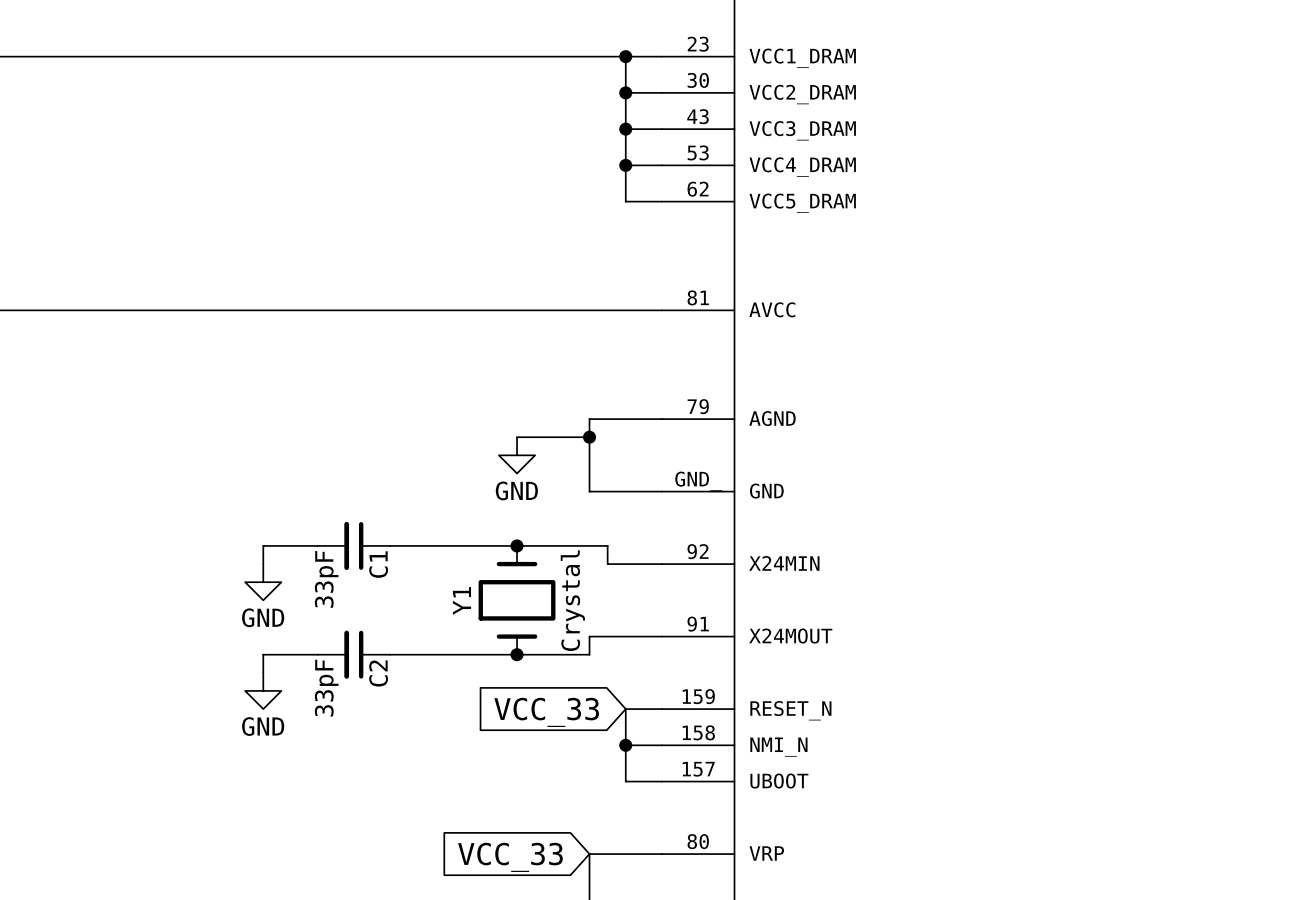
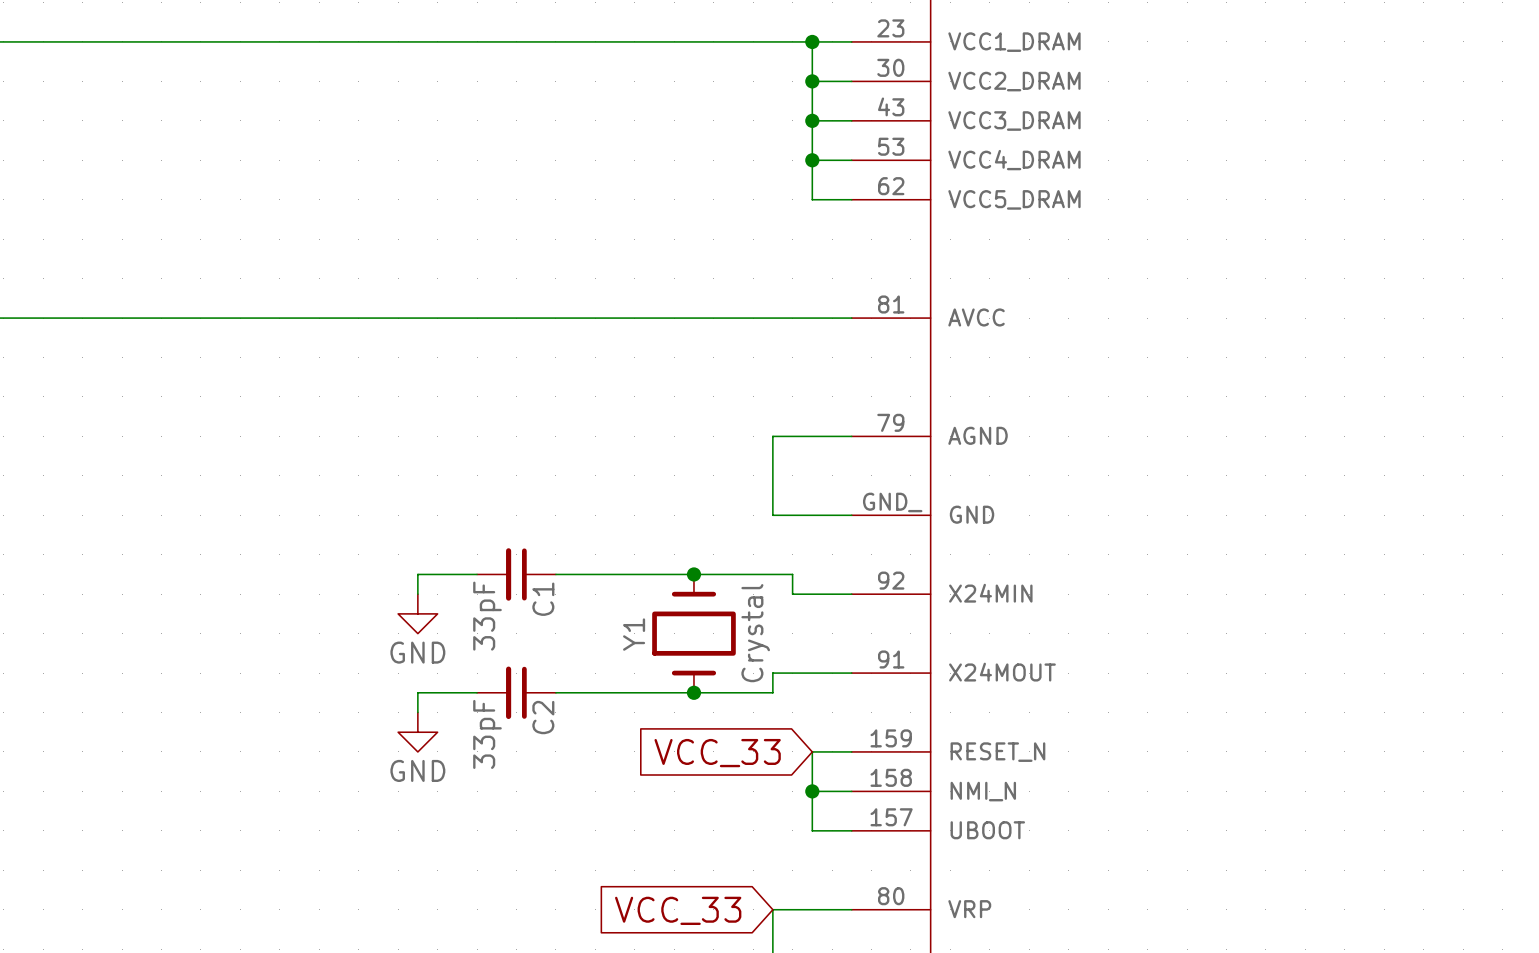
wire: (517, 437) (589, 437) -> none
junction: (589, 437) -> none
power symbol: GND (517, 455) -> none

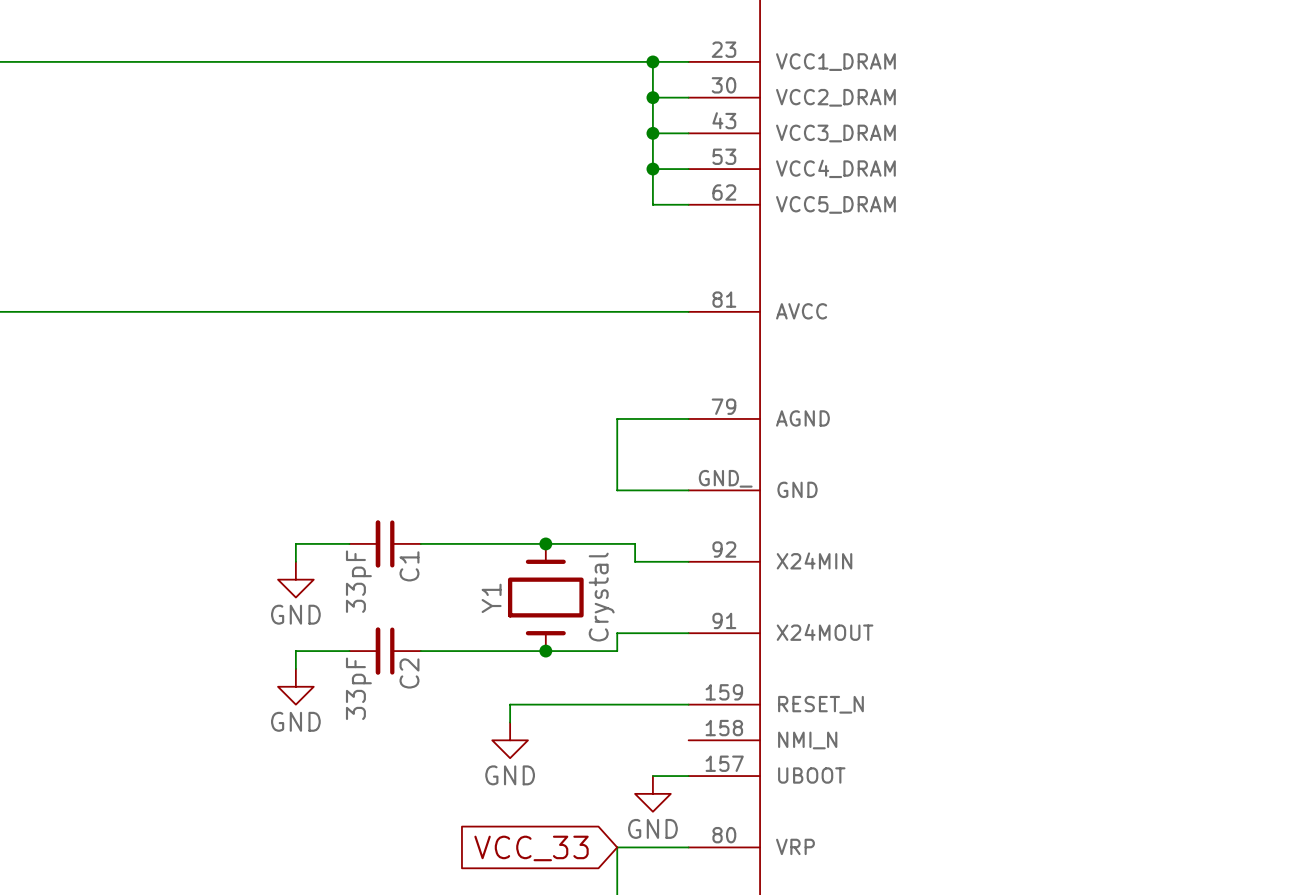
wire: (812, 751) (812, 830) -> (652, 704) (510, 704) (510, 722)
global label: VCC_33 (717, 753) -> none
power symbol: none -> GND (510, 740)
wire: (812, 791) (851, 791) -> none
junction: (812, 791) -> none
power symbol: none -> GND (652, 793)

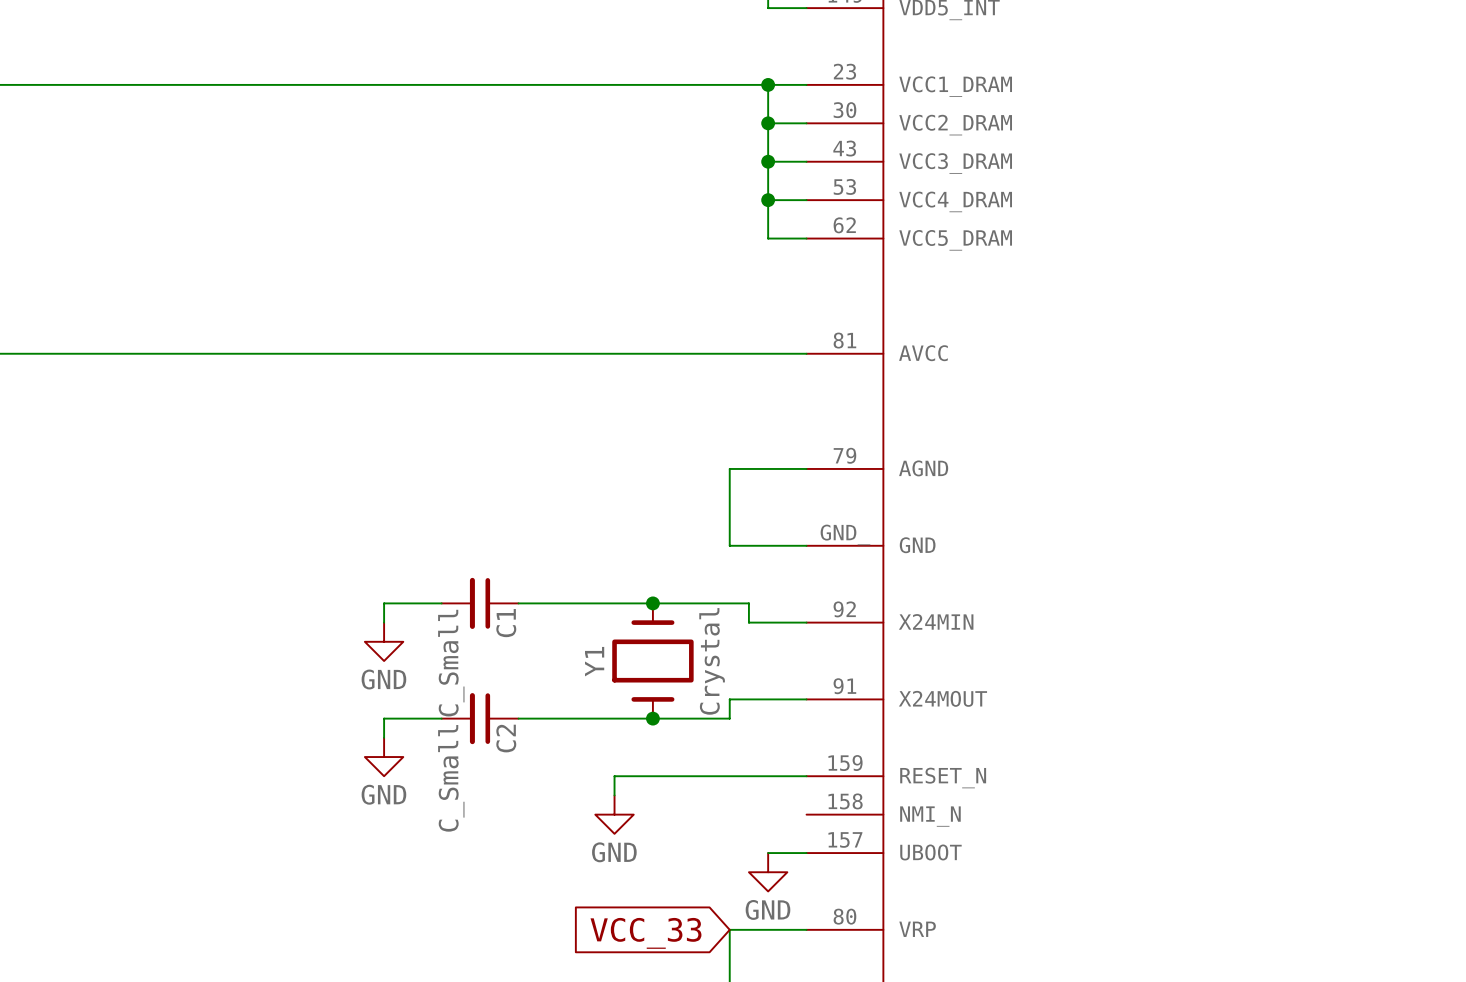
C1 value: 33pF (358, 581) -> C_Small (451, 663)
C2 value: 33pF (358, 688) -> C_Small (451, 778)

